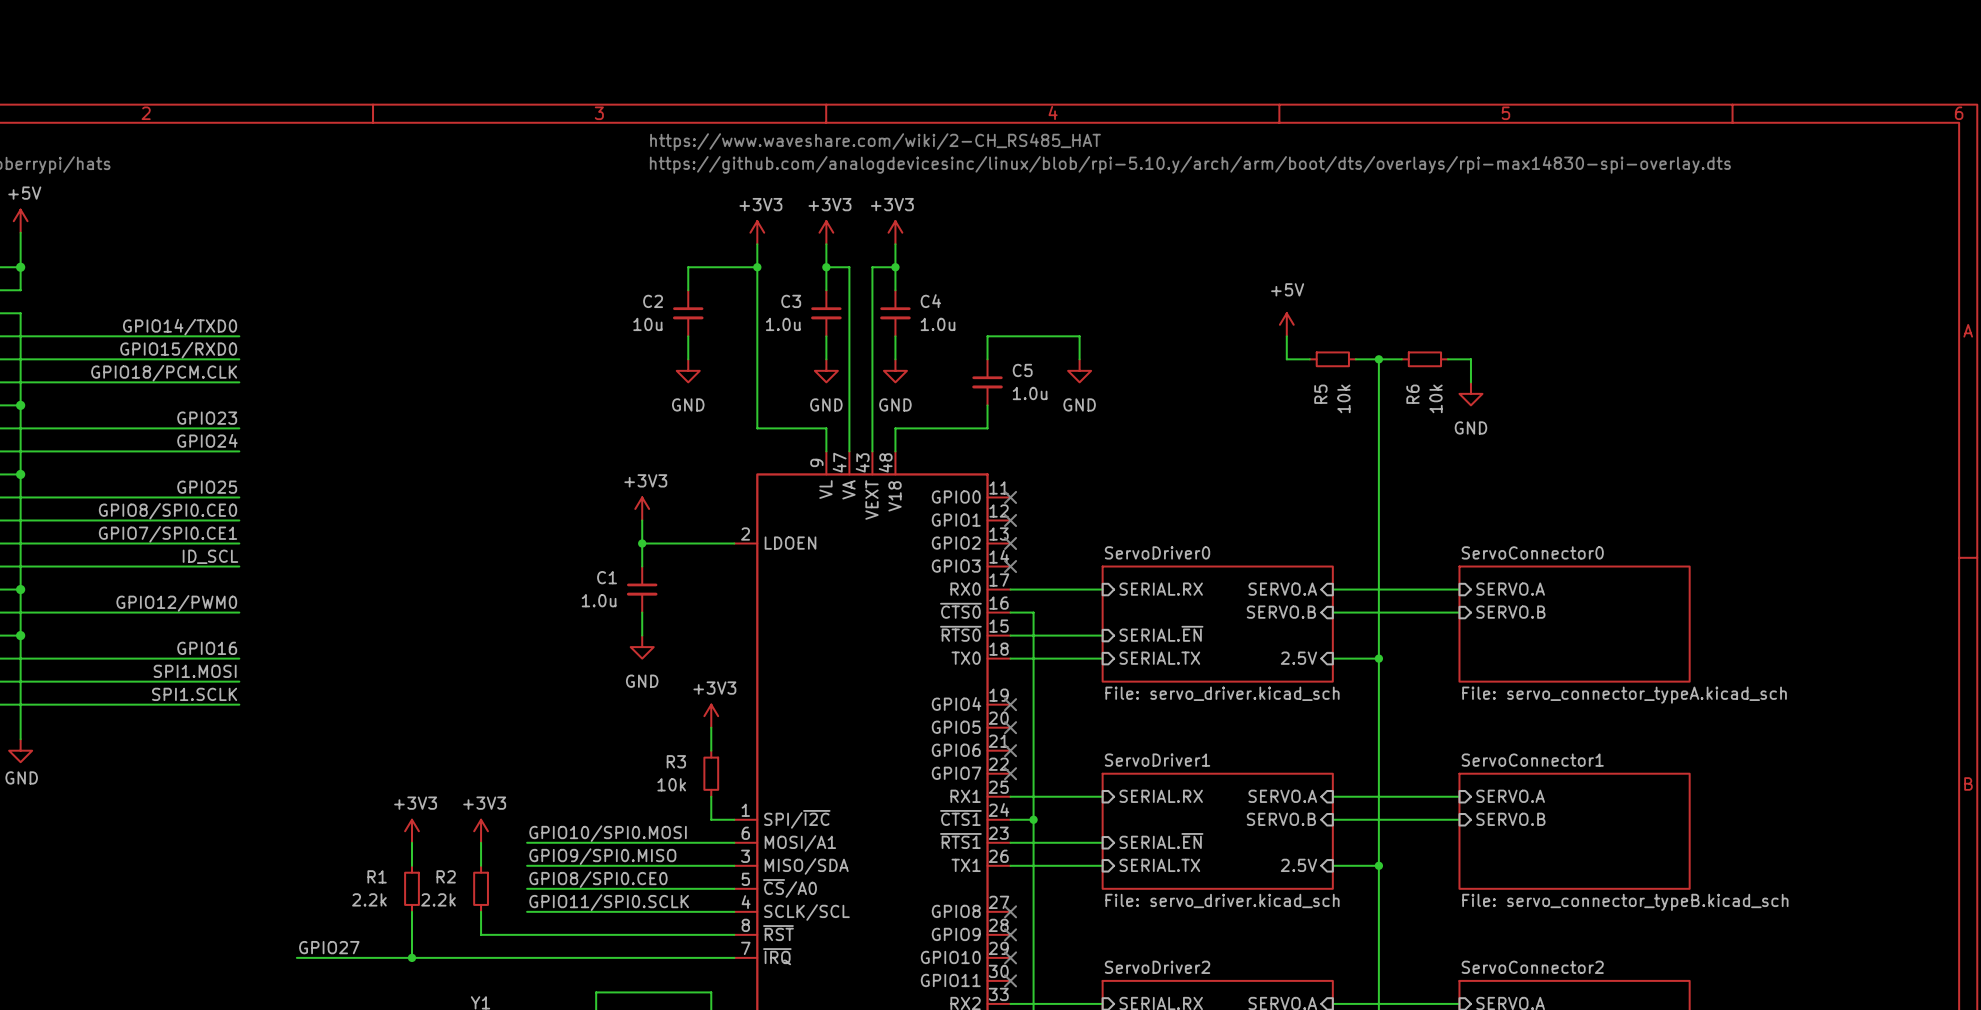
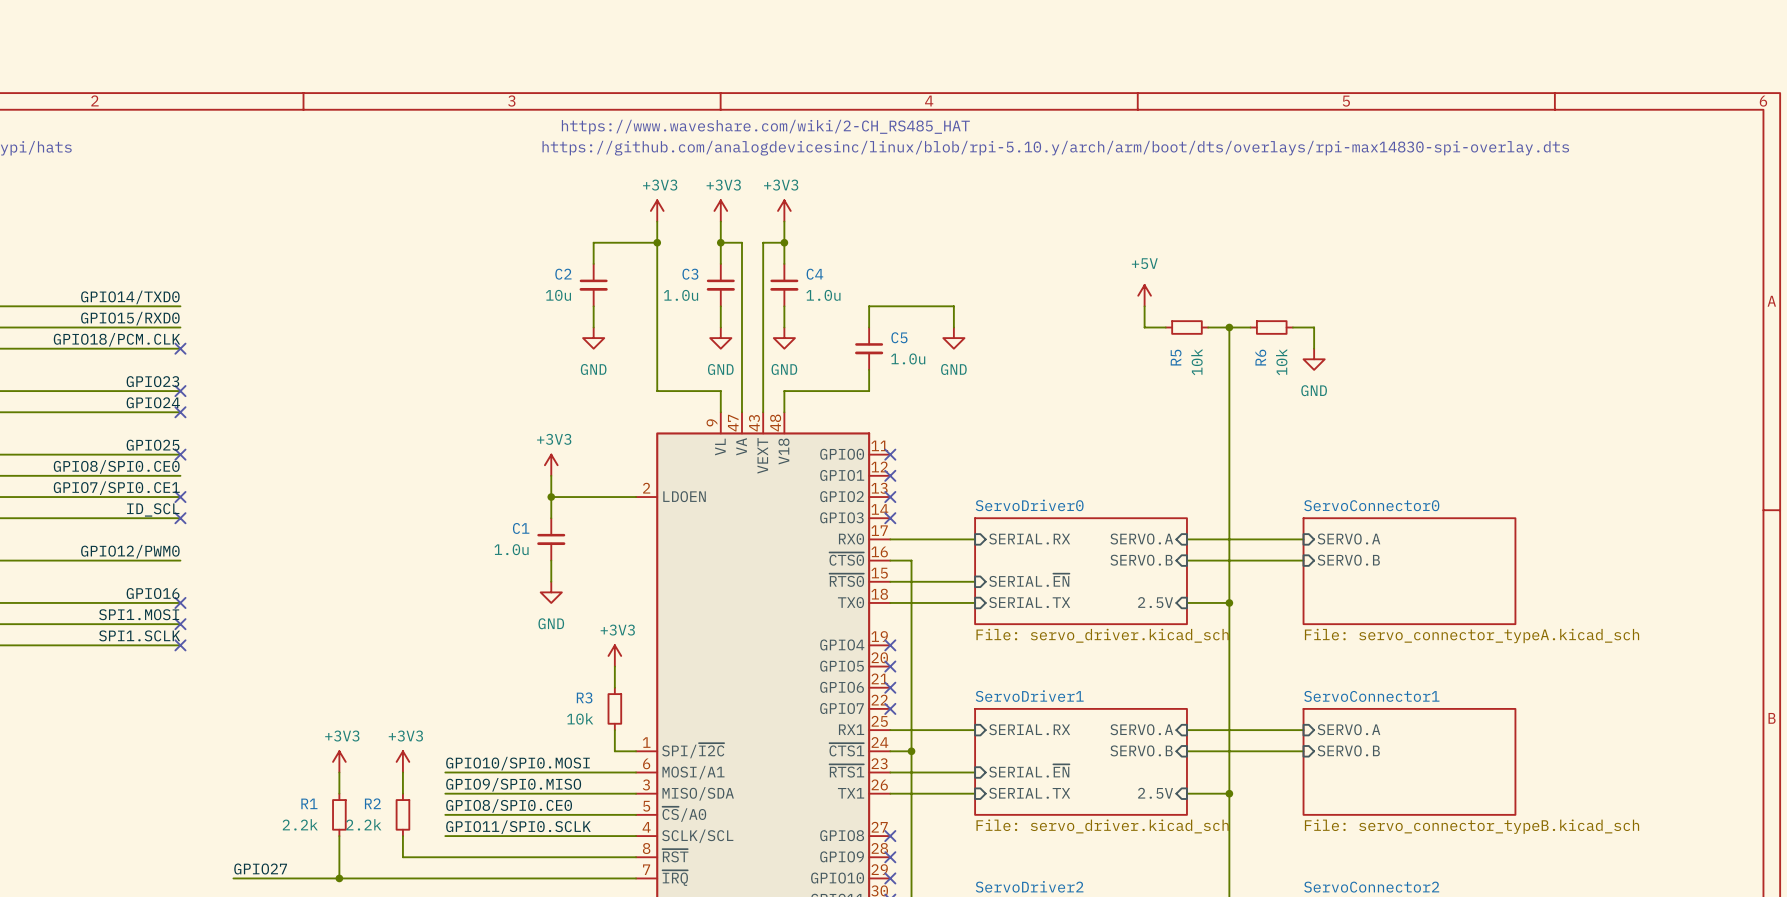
no-connect mark: none -> (180, 348)
no-connect mark: none -> (180, 391)
no-connect mark: none -> (180, 412)
no-connect mark: none -> (180, 454)
no-connect mark: none -> (180, 497)
no-connect mark: none -> (180, 518)
no-connect mark: none -> (180, 602)
no-connect mark: none -> (180, 624)
no-connect mark: none -> (180, 645)

